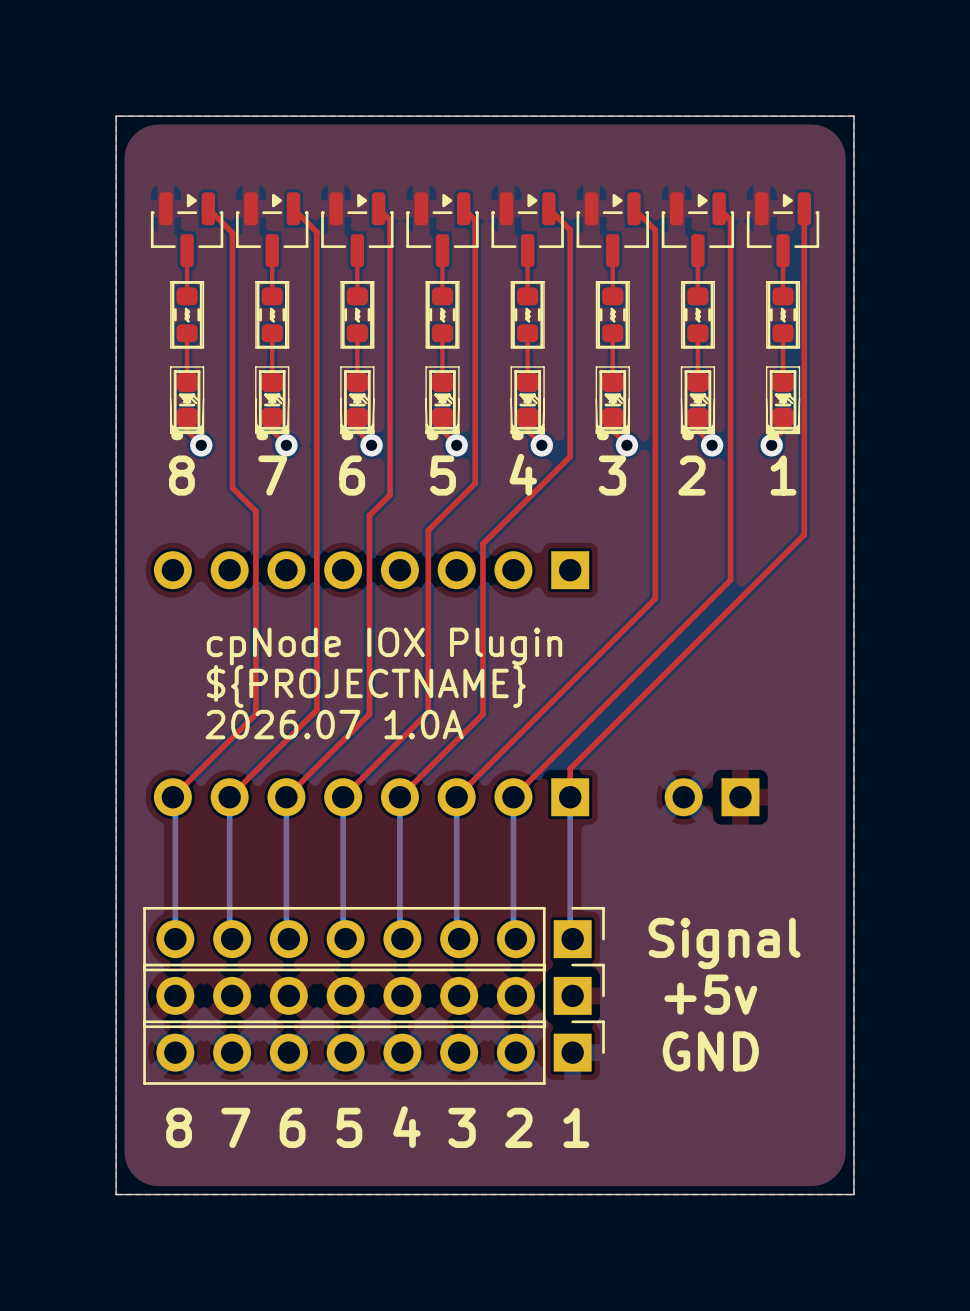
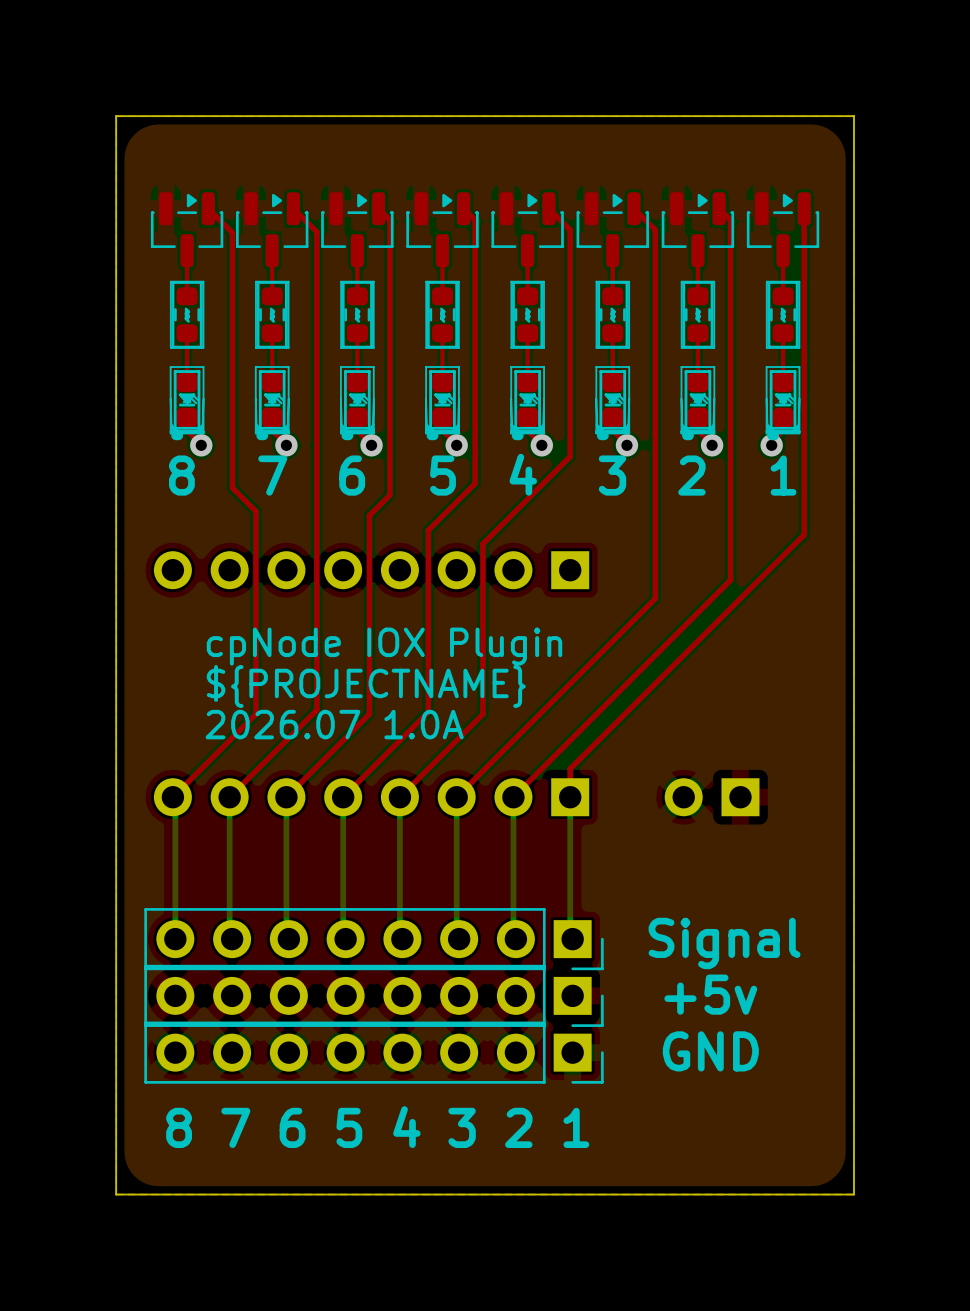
part footprint: [143, 906, 605, 972] -> [144, 908, 604, 971]
part footprint: [143, 963, 605, 1029] -> [144, 964, 604, 1027]
part footprint: [143, 1020, 605, 1085] -> [144, 1021, 604, 1084]

